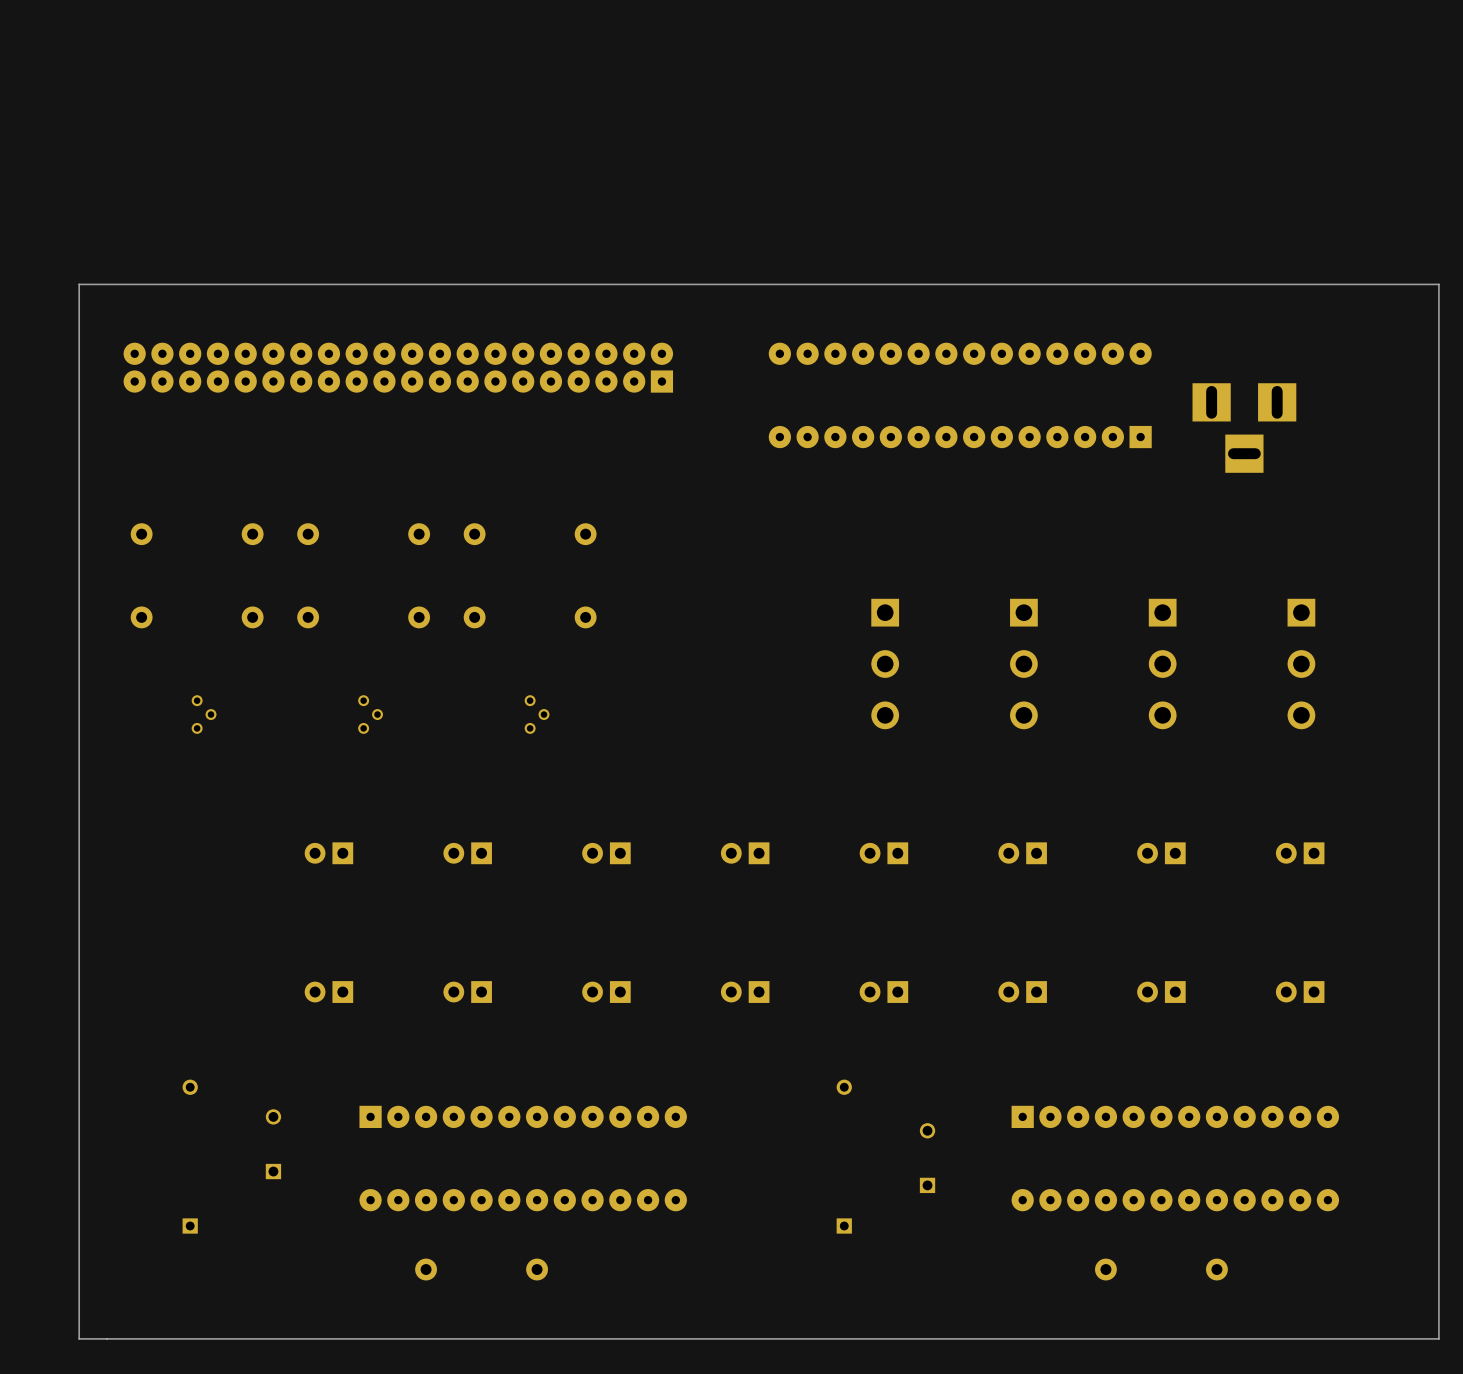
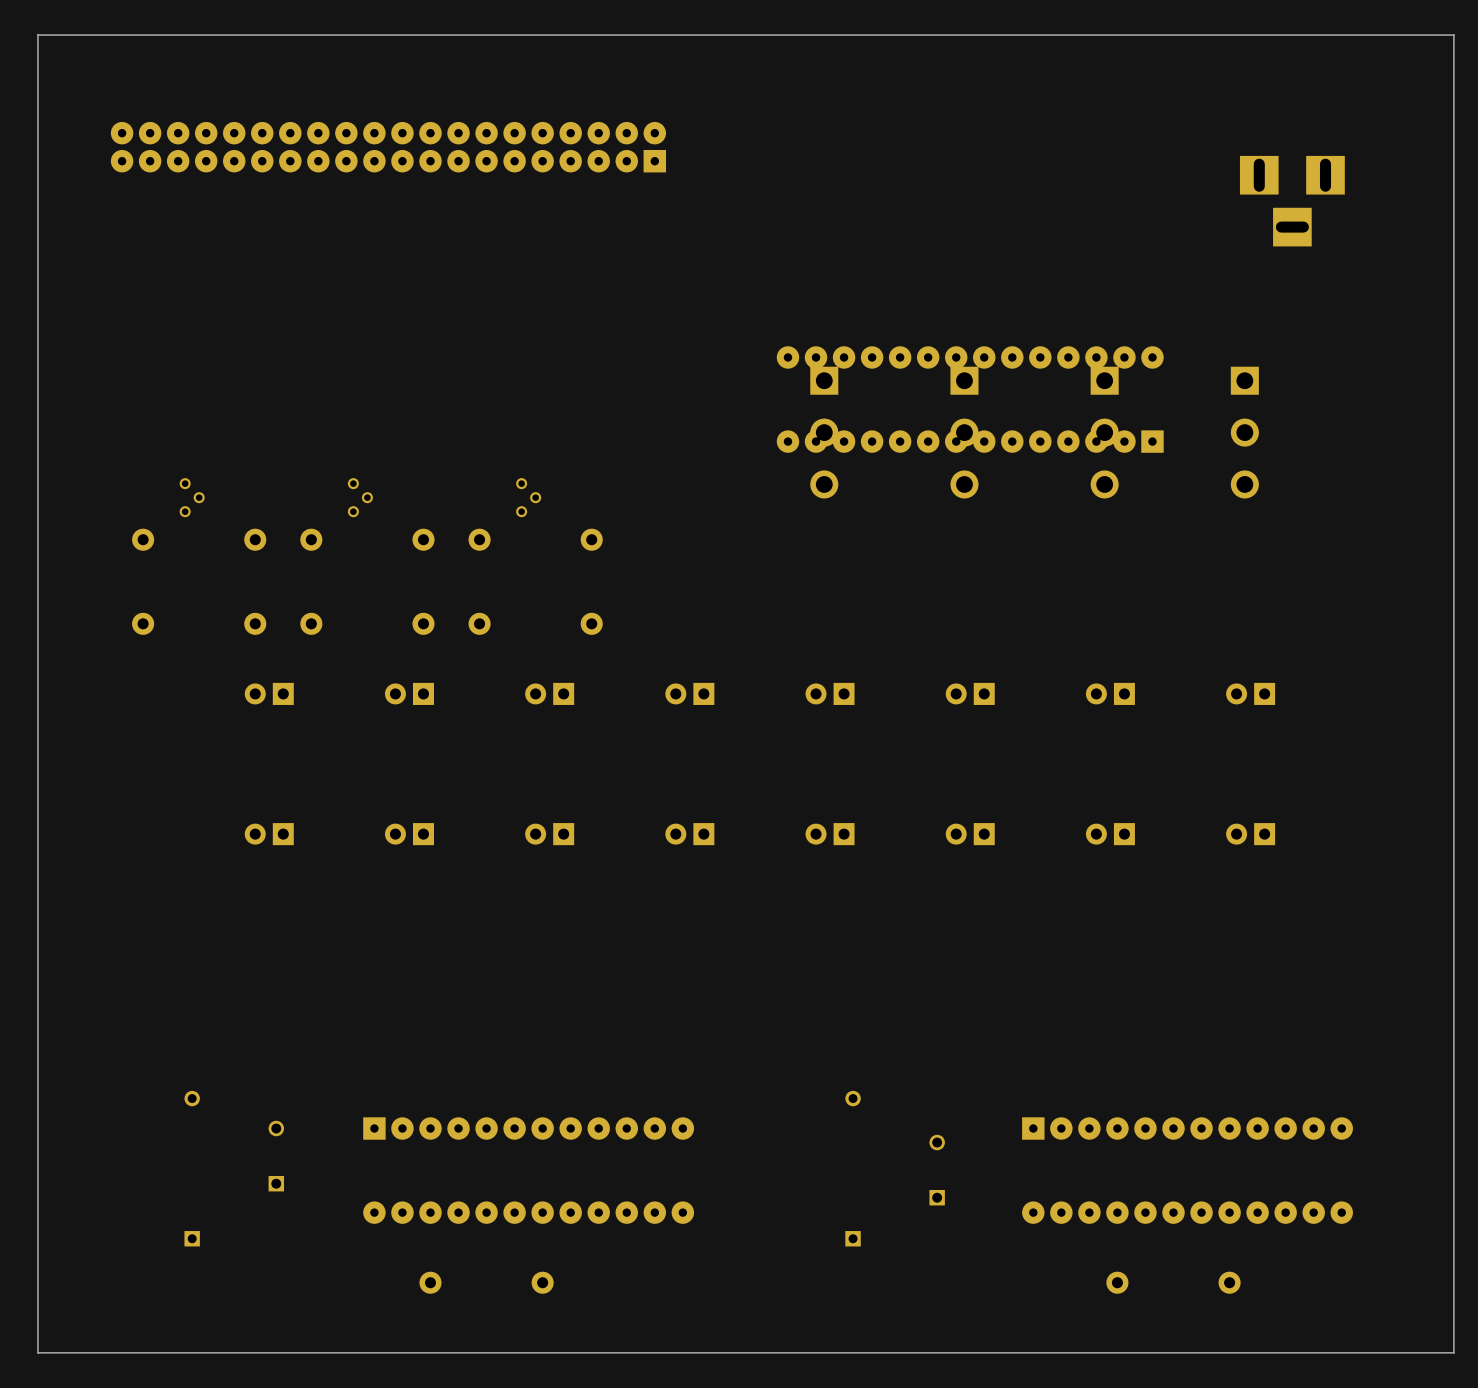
board edge: (1438, 284) (79, 284) (79, 1338) -> (1453, 287) (1453, 35) (37, 35) (37, 1352) (80, 1352)
part position: (398, 367) -> (388, 147)
part: none -> (824, 432)
part: none -> (964, 432)
part: none -> (1104, 432)
part: none -> (1244, 432)
part position: (1244, 428) -> (1292, 201)
part: none -> (192, 497)
part: none -> (360, 497)
part: none -> (528, 497)
part: (885, 664) -> none
part: (1023, 664) -> none
part: (1162, 664) -> none
part: (1301, 664) -> none
part: none -> (269, 693)
part: none -> (409, 693)
part: none -> (549, 693)
part: none -> (689, 693)
part: none -> (830, 693)
part: none -> (970, 693)
part: none -> (1110, 693)
part: none -> (1250, 693)
part: (204, 714) -> none
part: (370, 714) -> none
part: (537, 714) -> none
part: none -> (269, 834)
part: none -> (409, 834)
part: none -> (549, 834)
part: none -> (689, 834)
part: none -> (830, 834)
part: none -> (970, 834)
part: none -> (1110, 834)
part: none -> (1250, 834)
part: (328, 853) -> none
part: (467, 853) -> none
part: (606, 853) -> none
part: (745, 853) -> none
part: (883, 853) -> none
part: (1022, 853) -> none
part: (1161, 853) -> none
part: (1300, 853) -> none
part: (328, 992) -> none
part: (467, 992) -> none
part: (606, 992) -> none
part: (745, 992) -> none
part: (883, 992) -> none
part: (1022, 992) -> none
part: (1161, 992) -> none
part: (1300, 992) -> none

